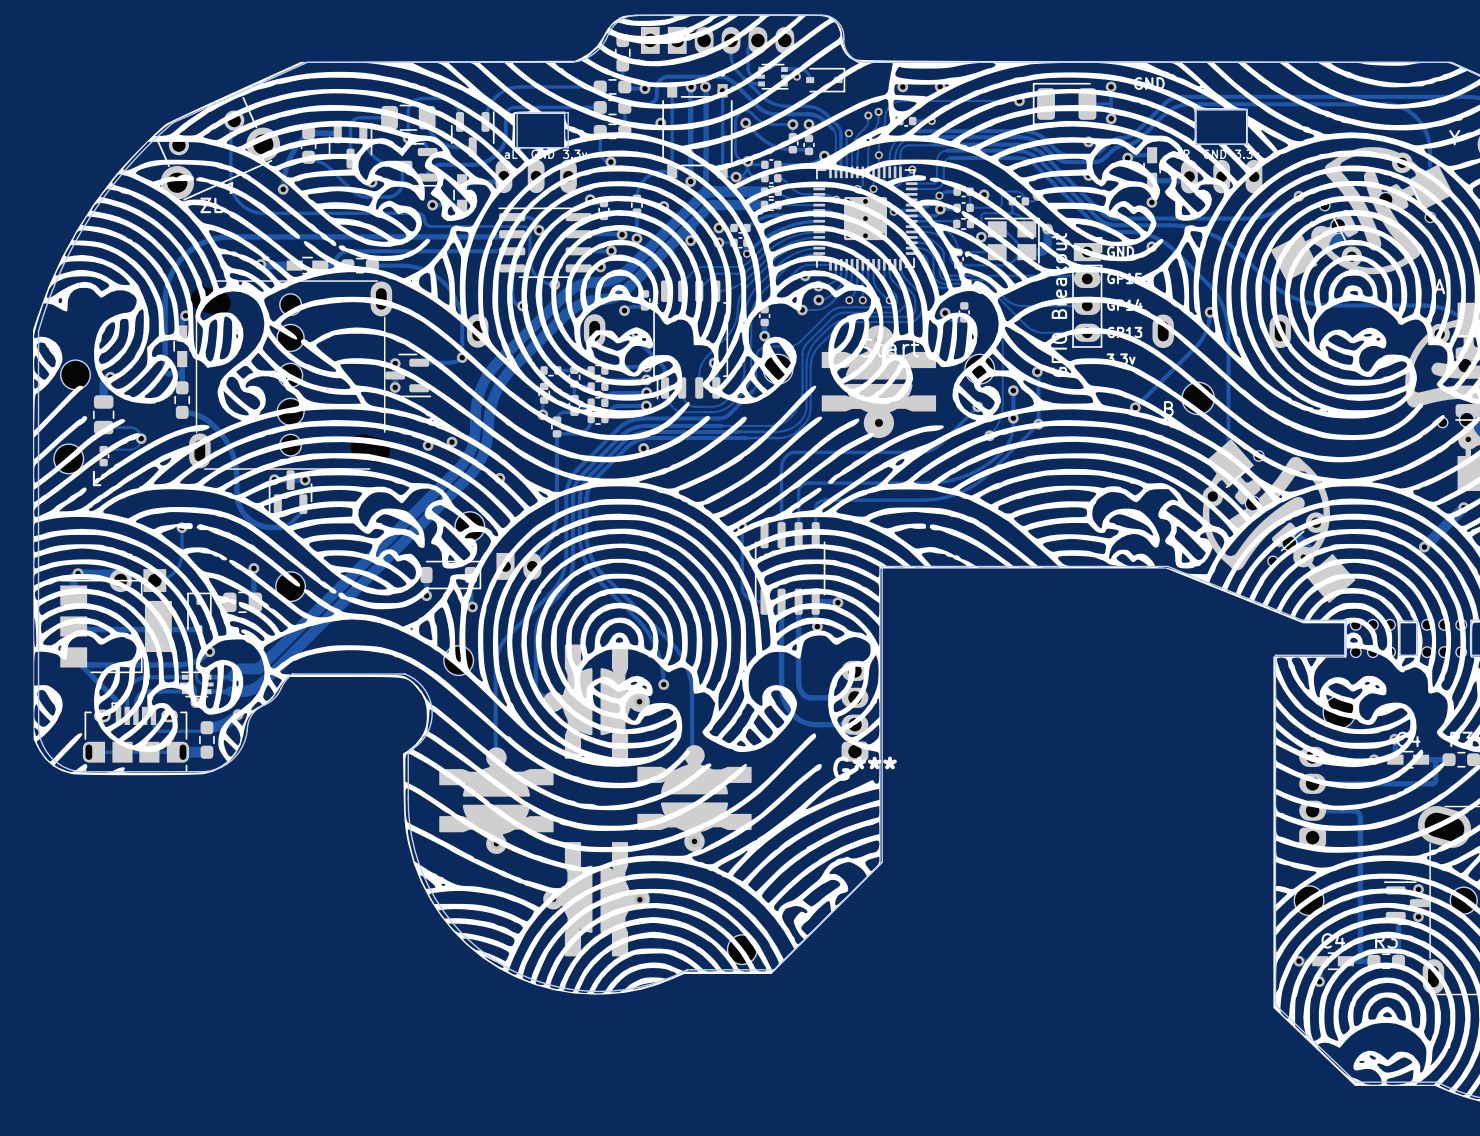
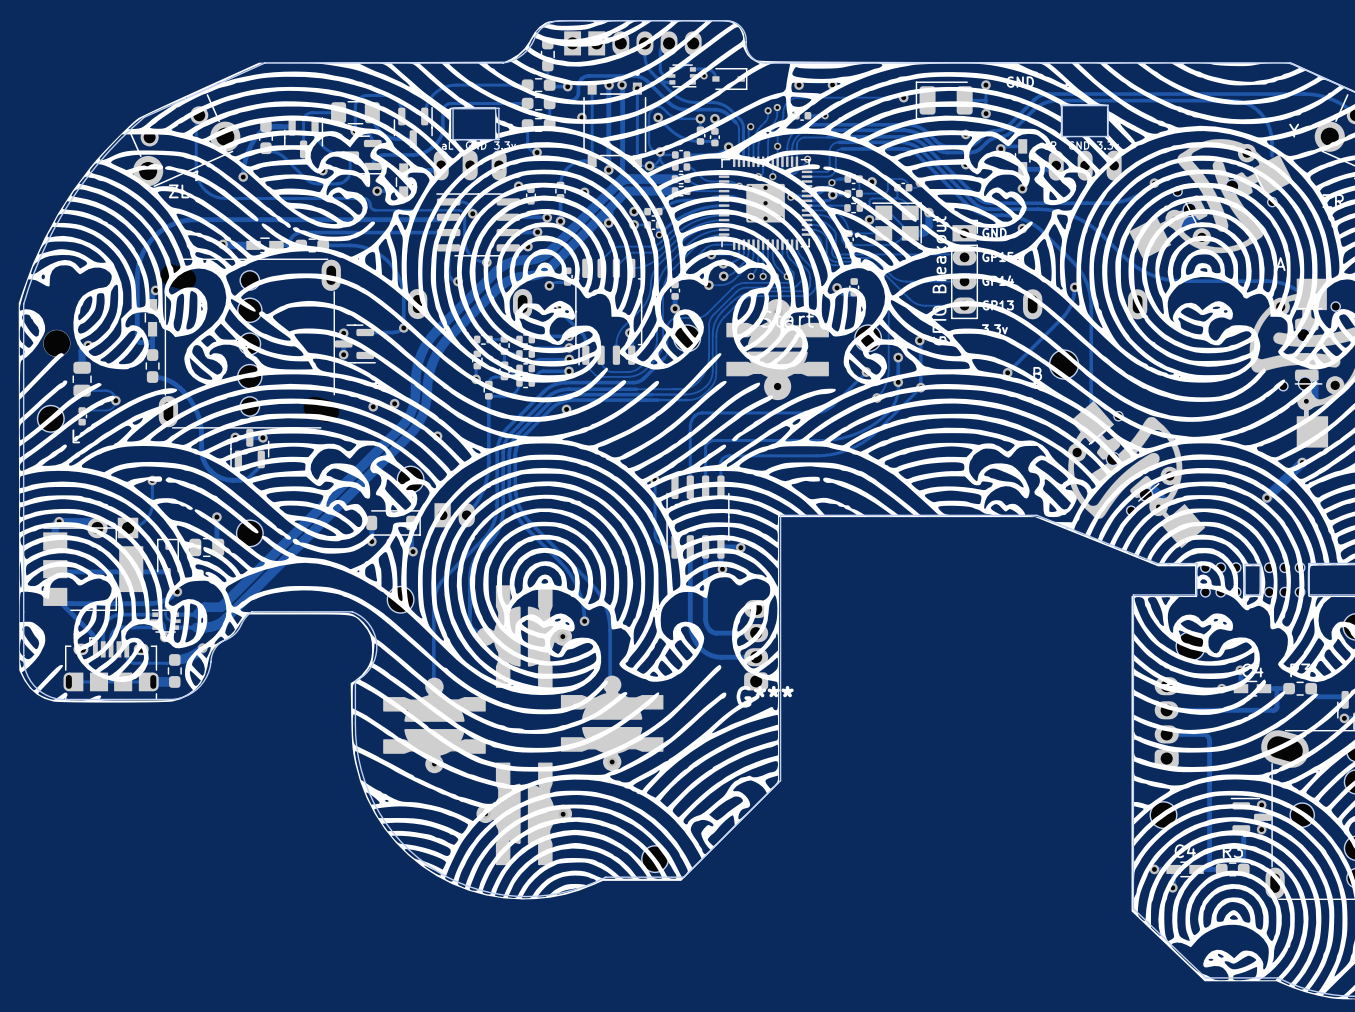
part footprint: [60, 360, 91, 390] -> [43, 329, 71, 358]

